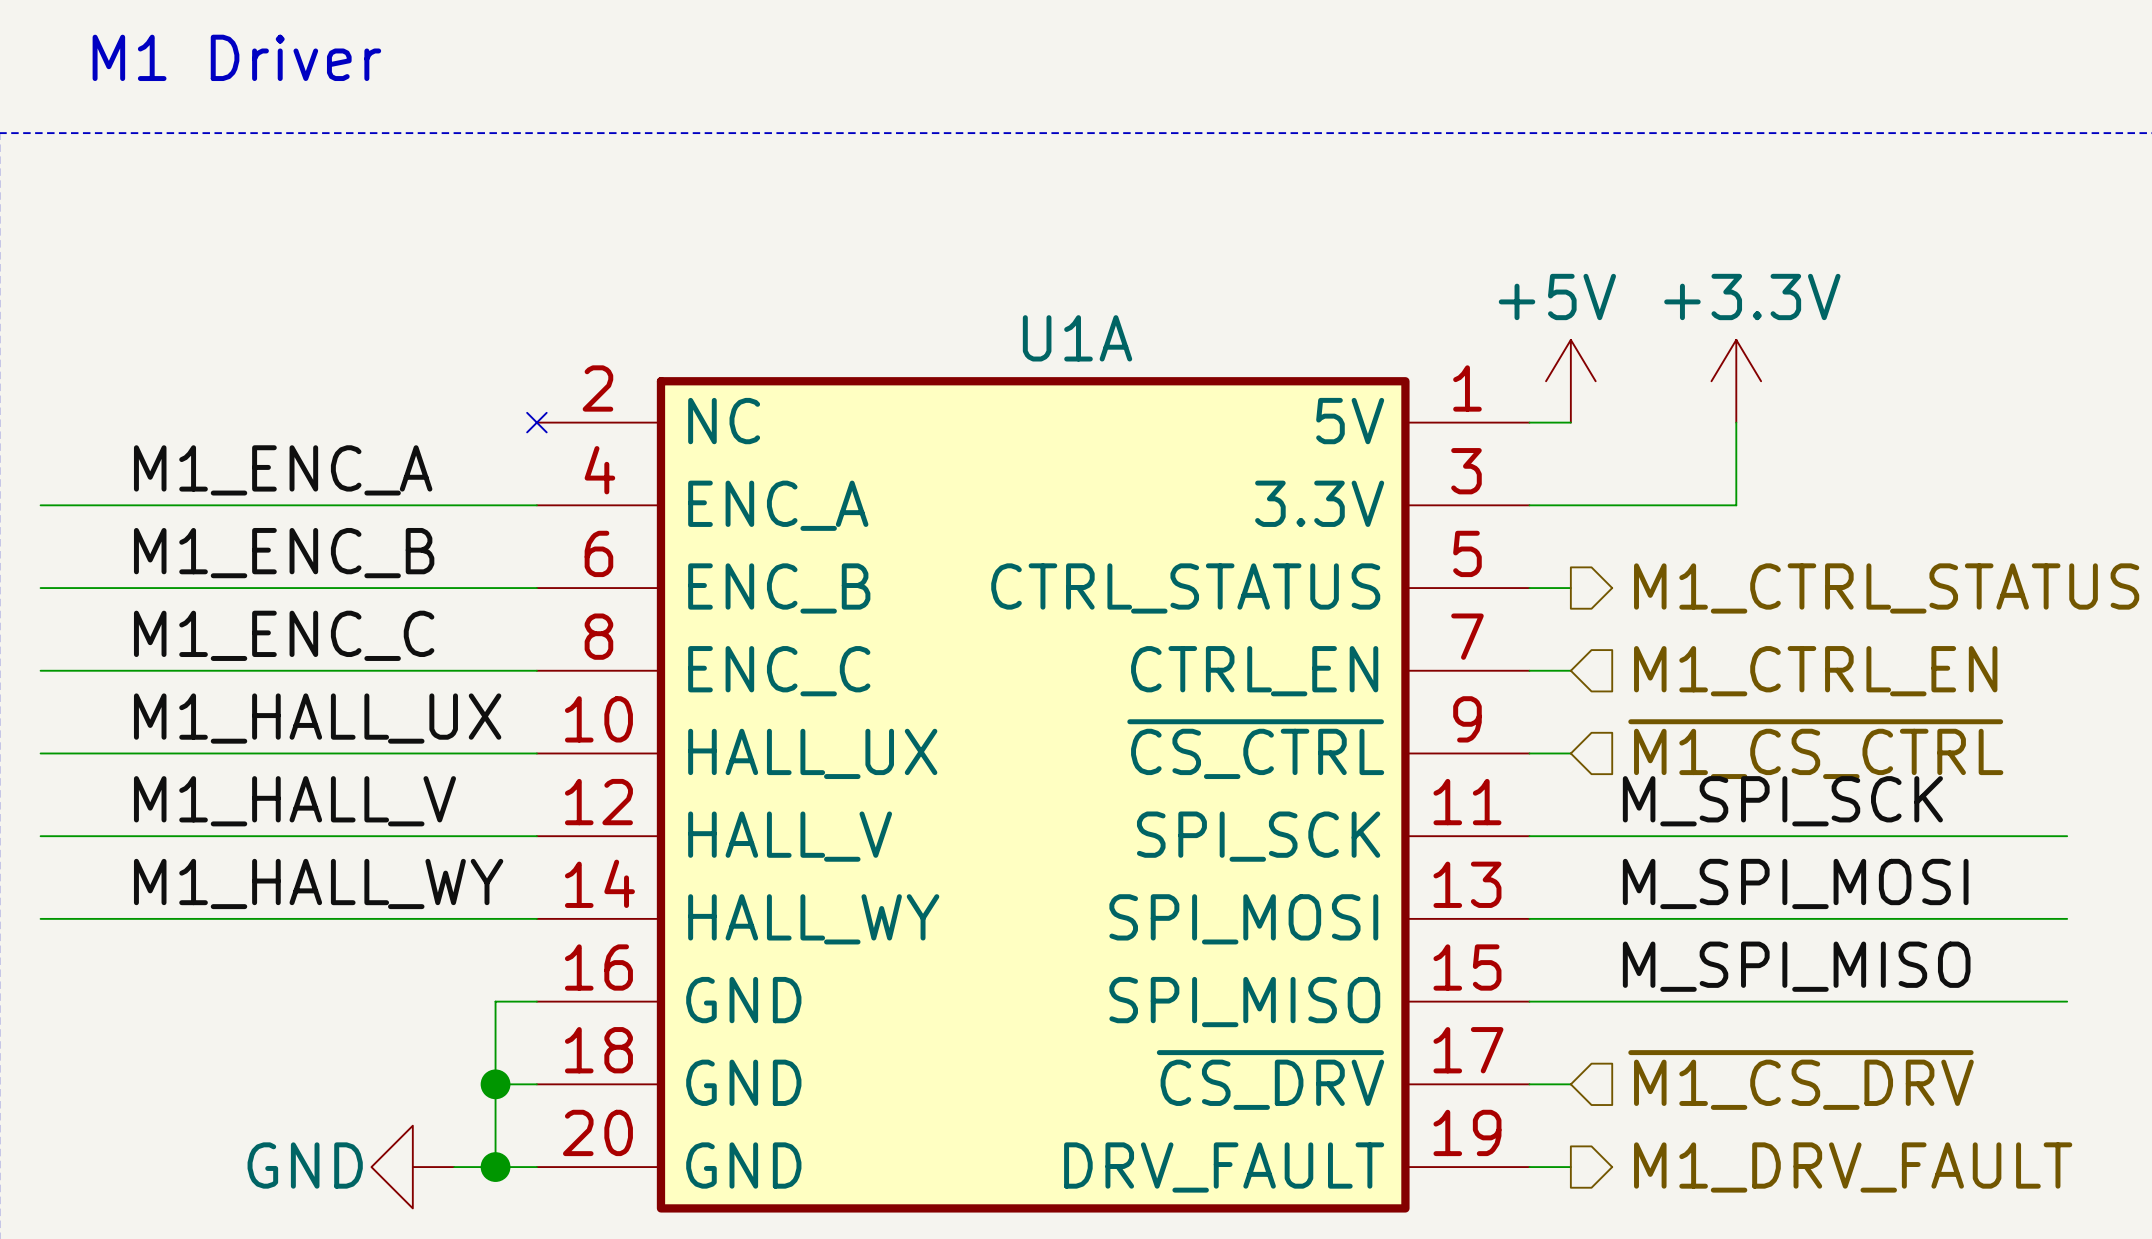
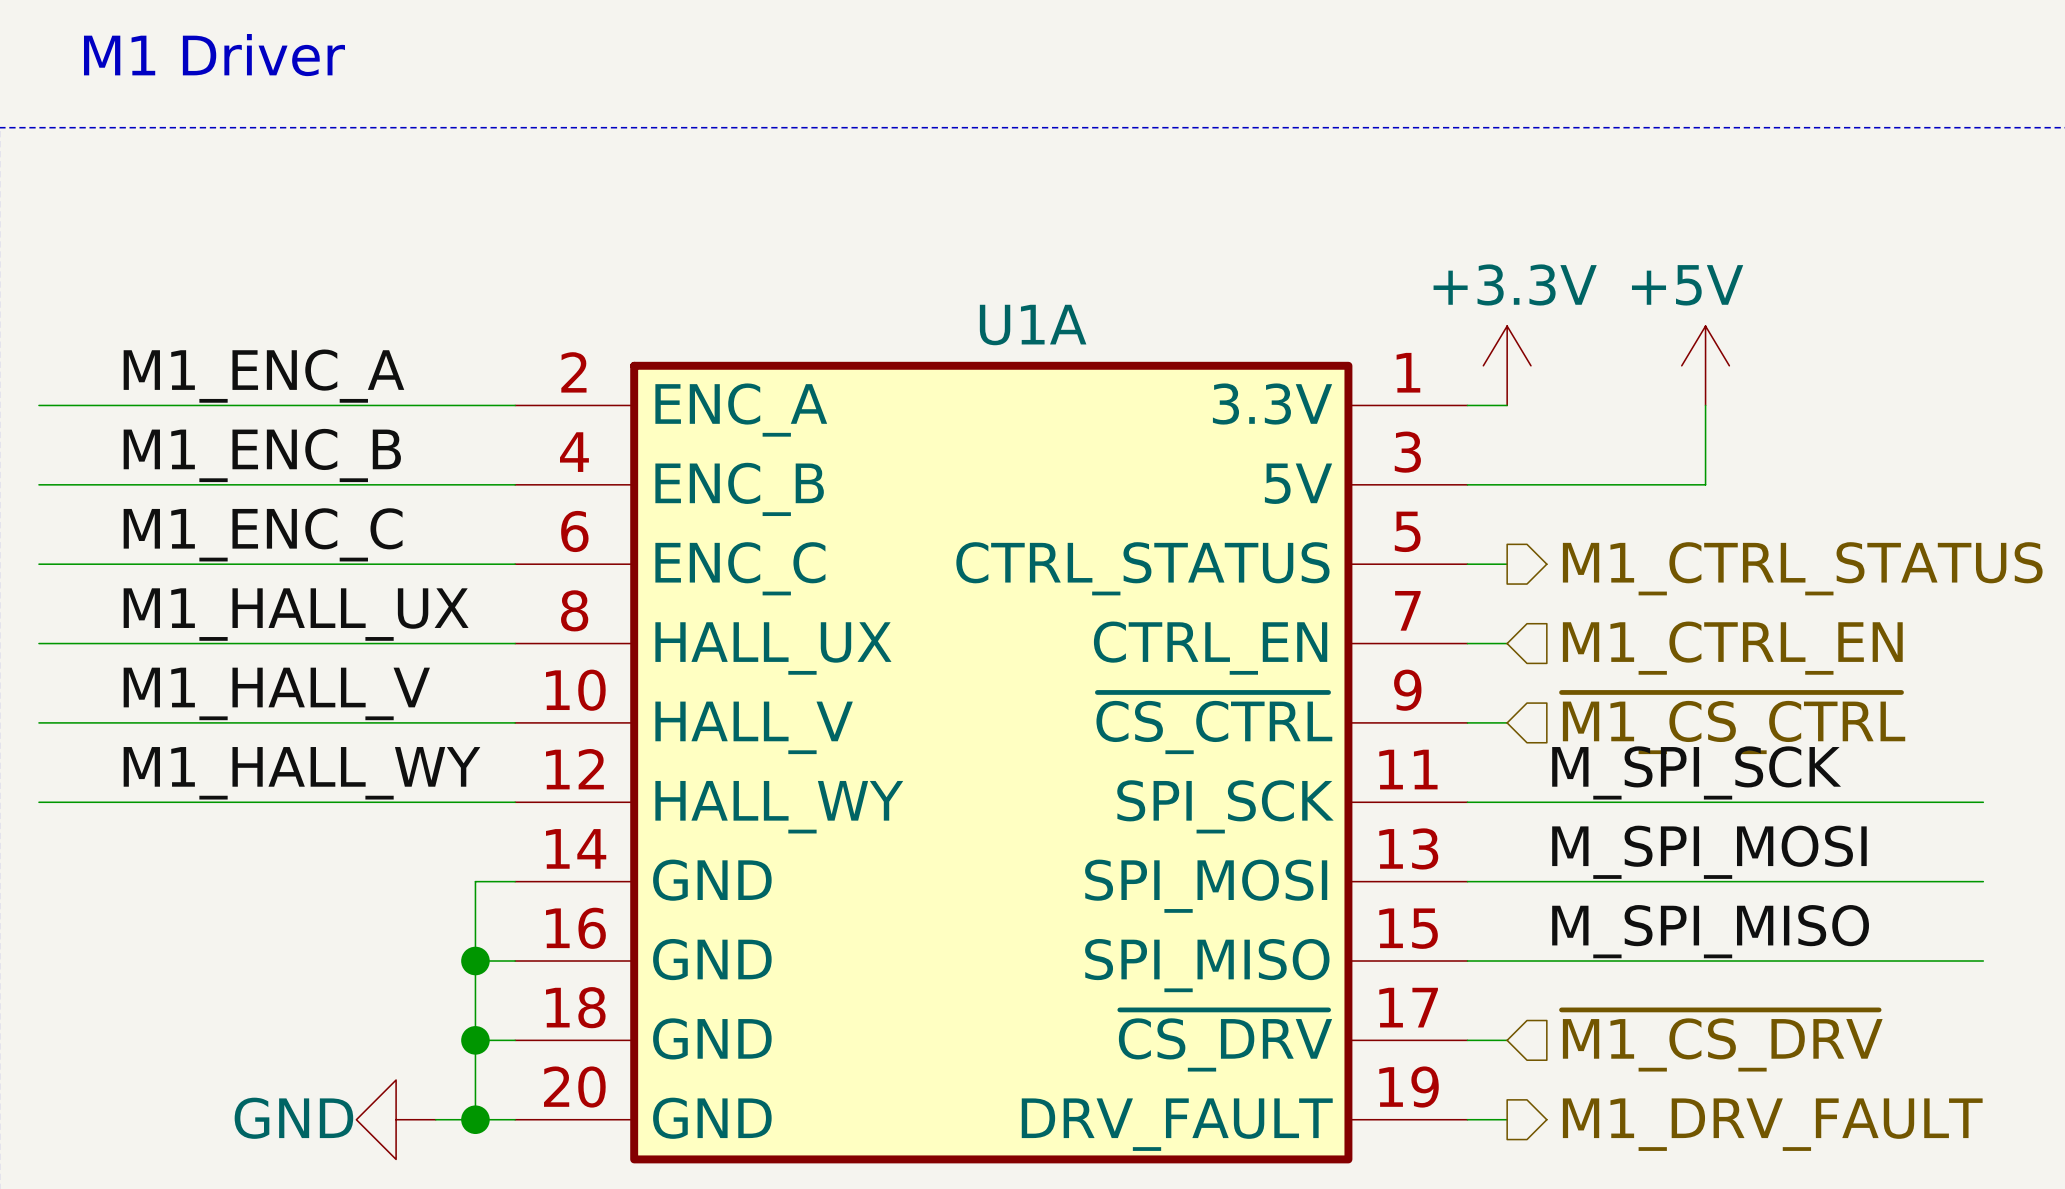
U1A symbol: [527, 377, 1530, 1213] -> [515, 361, 1468, 1164]
power symbol: +5V (1570, 381) -> +3.3V (1507, 365)
power symbol: +3.3V (1736, 381) -> none
power symbol: none -> +5V (1705, 365)
label: none -> M1_ENC_A (263, 376)
wire: none -> (38, 405) (515, 405)
wire: (1736, 422) (1736, 505) -> (1705, 405) (1705, 484) (1665, 484)
label: M1_ENC_A (283, 470) -> M1_ENC_B (262, 455)
label: M1_ENC_B (284, 553) -> M1_ENC_C (263, 534)
label: M1_ENC_C (284, 635) -> M1_HALL_UX (296, 614)
label: M1_HALL_UX (317, 718) -> M1_HALL_V (276, 693)
label: M1_HALL_V (294, 801) -> M1_HALL_WY (301, 773)
label: M1_HALL_WY (318, 883) -> none
wire: (40, 918) (495, 918) -> (475, 961) (475, 881)
junction: none -> (475, 961)

